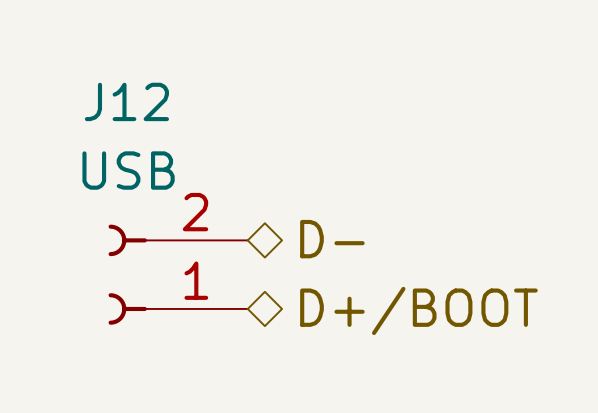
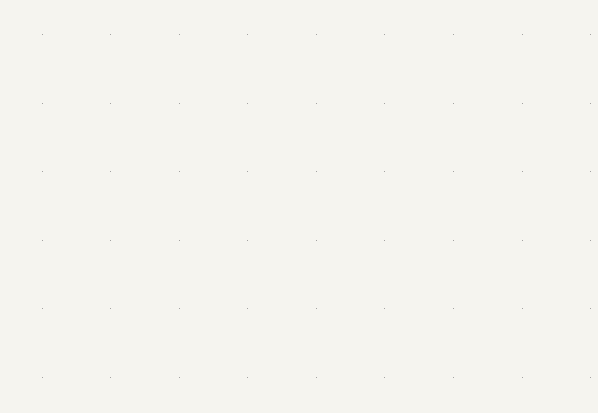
hierarchical label: D- (332, 239) -> none
J12: USB (178, 274) -> none
hierarchical label: D+/BOOT (418, 310) -> none

